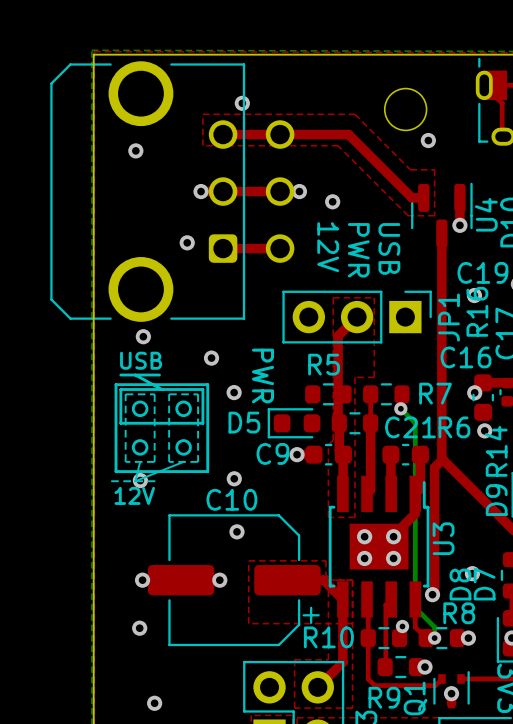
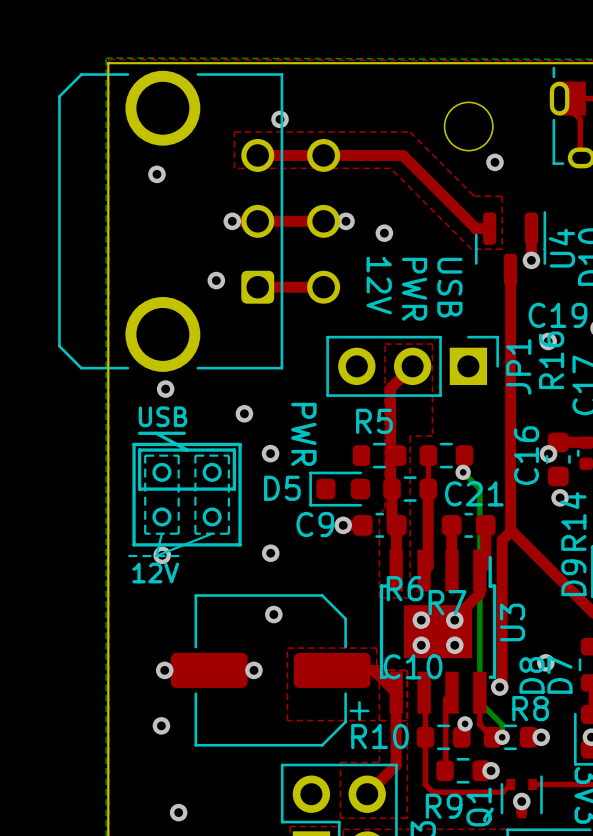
C16 name rotation: 0° (466, 357) -> 90° counterclockwise (526, 455)
R7 name position: R7 (435, 393) -> R7 (447, 602)
R6 name position: R6 (454, 427) -> R6 (405, 588)
C10 name position: C10 (231, 499) -> C10 (413, 666)

